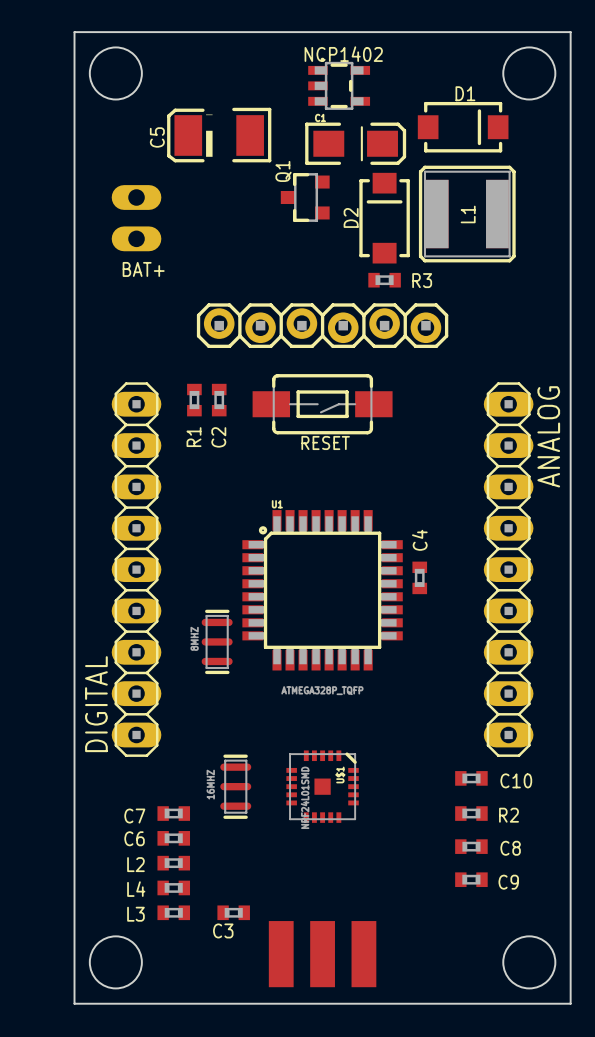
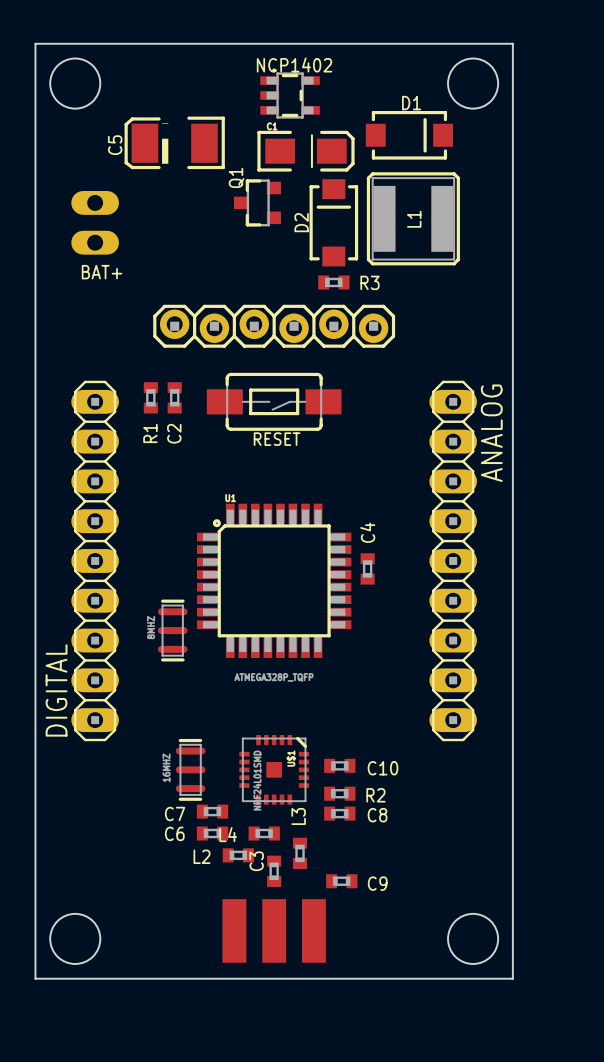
C10 position: (471, 778) -> (339, 765)
C7 position: (173, 813) -> (212, 811)
R2 position: (471, 813) -> (339, 793)
C6 position: (173, 838) -> (212, 833)
C8 position: (471, 846) -> (339, 813)
L2 position: (173, 863) -> (238, 855)
C9 position: (471, 879) -> (341, 881)
L4 position: (173, 887) -> (264, 833)
L3 rotation: 0° (173, 912) -> 90° clockwise (300, 853)
L3 position: (173, 912) -> (300, 853)
C3 rotation: 0° (233, 912) -> 90° clockwise (274, 871)
C3 position: (233, 912) -> (274, 871)

